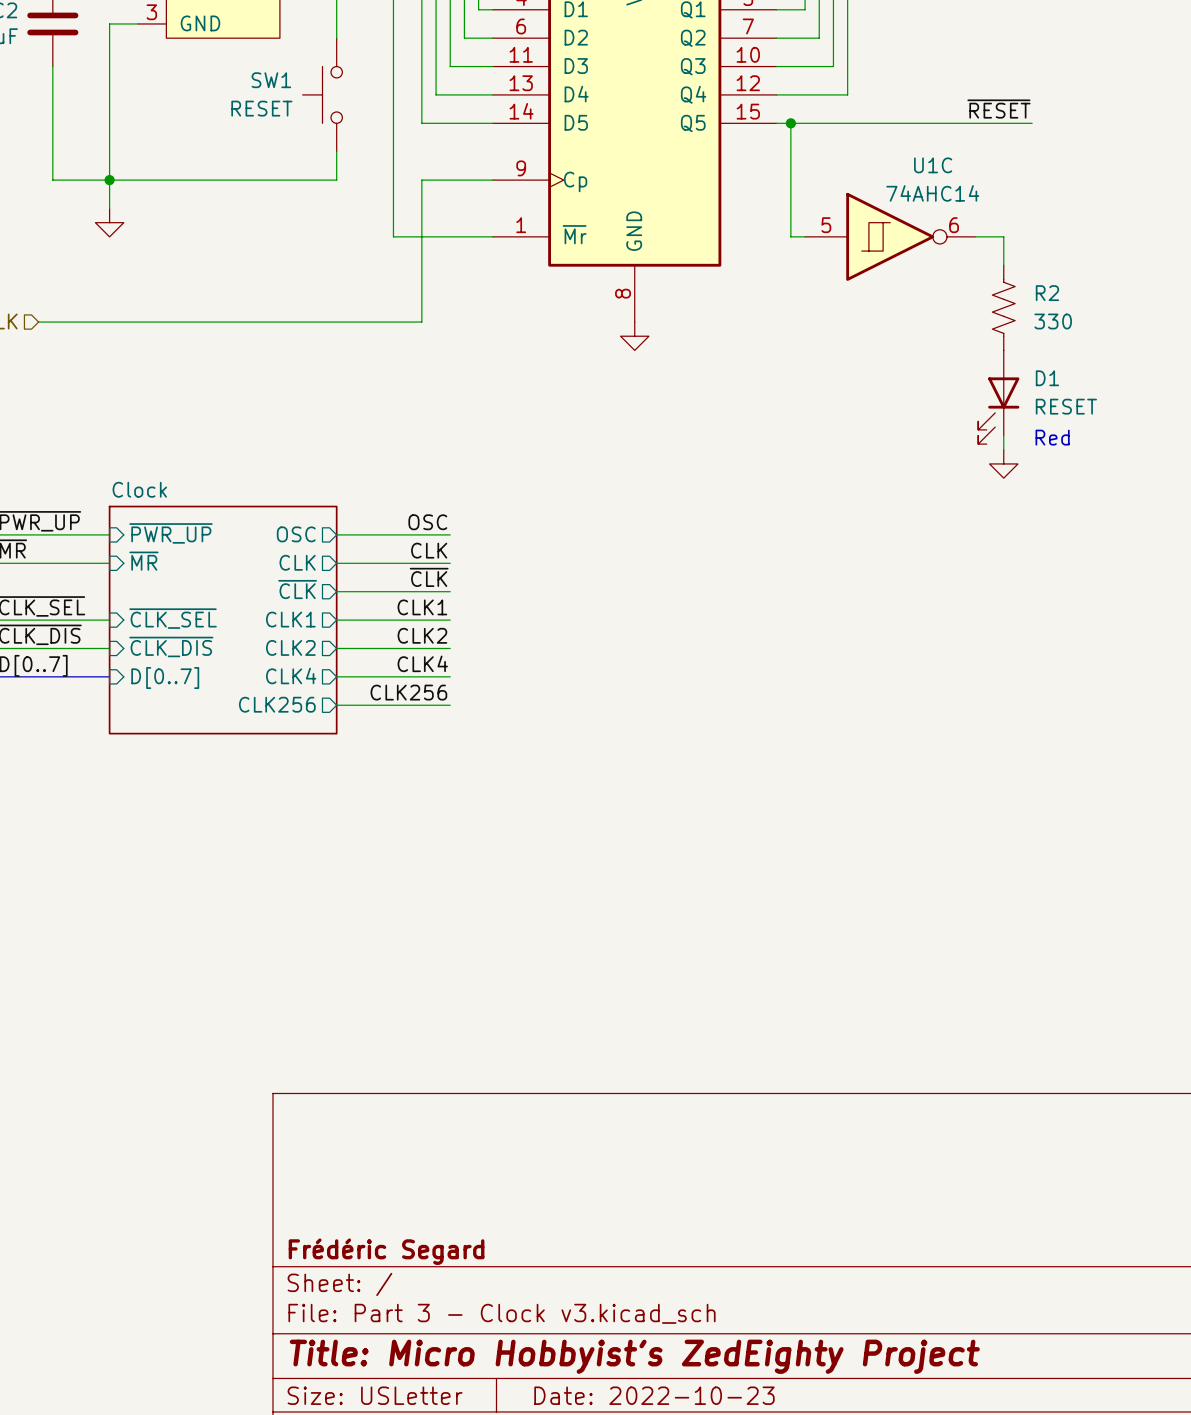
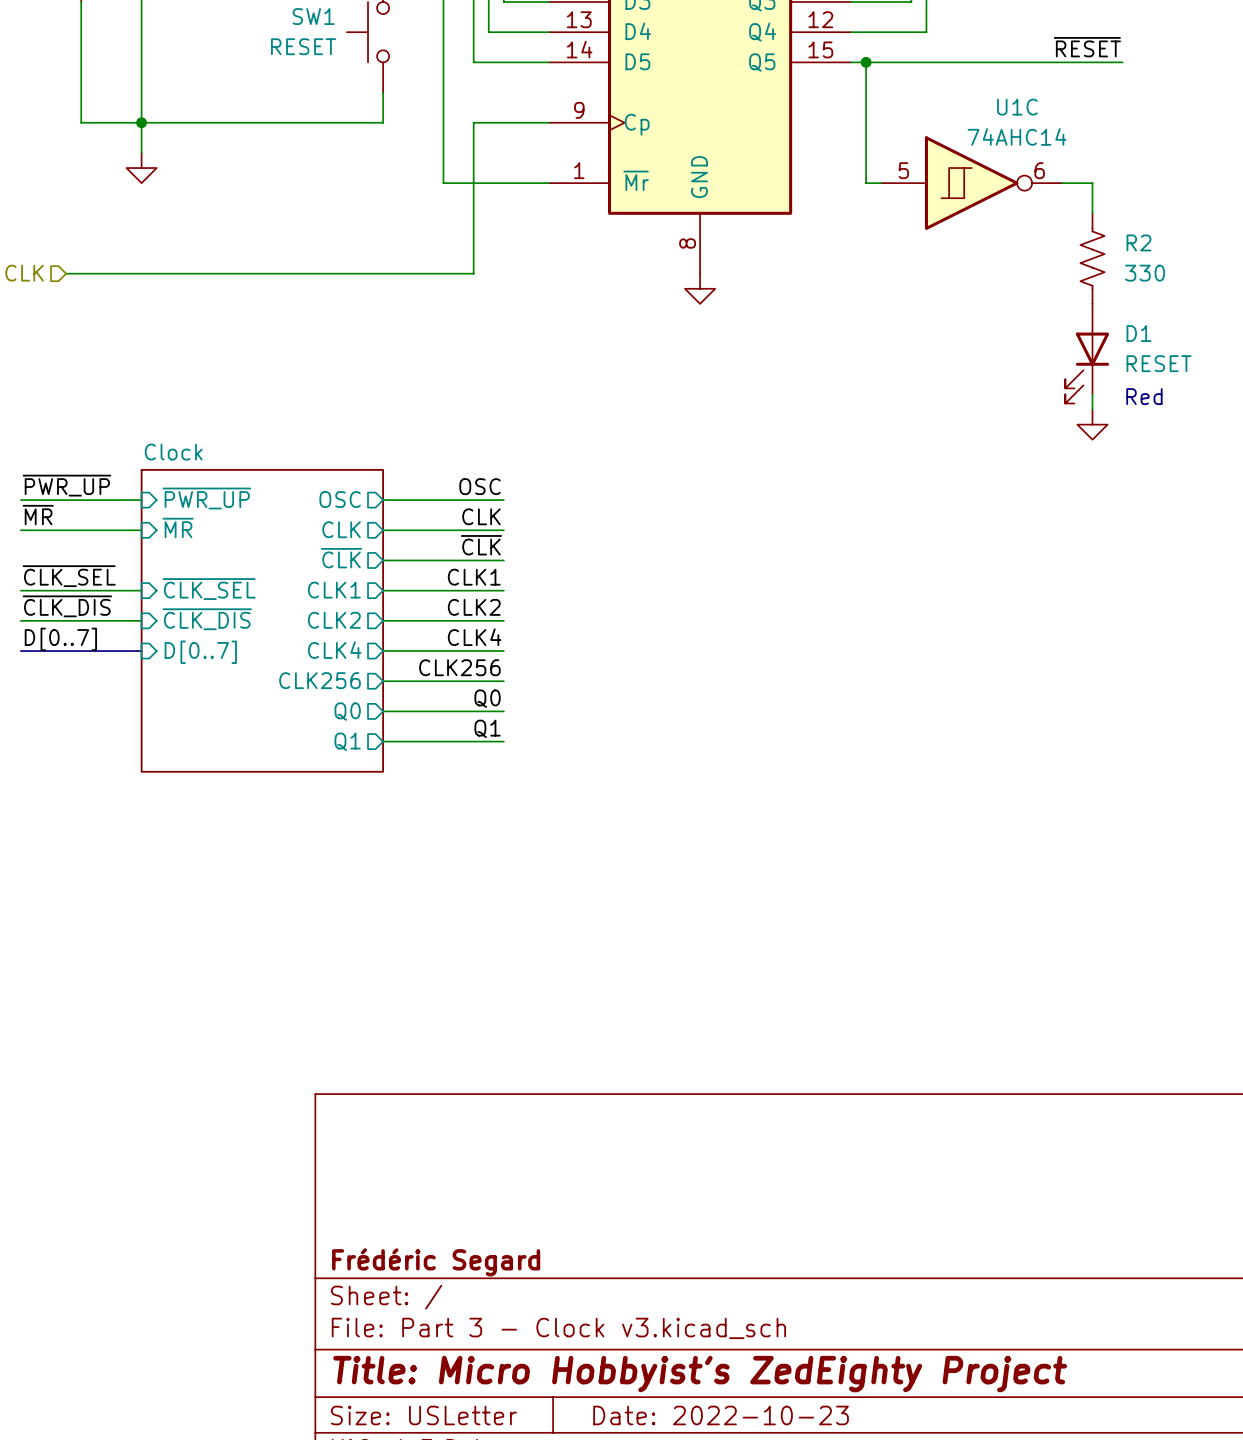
sheet Clock: (223, 620) -> none
sheet Clock: none -> (262, 620)
label: none -> Q0 (487, 698)
sheet pin: none -> Q0 (347, 711)
wire: none -> (383, 711) (503, 711)
label: none -> Q1 (487, 728)
sheet pin: none -> Q1 (347, 741)
wire: none -> (383, 741) (503, 741)

